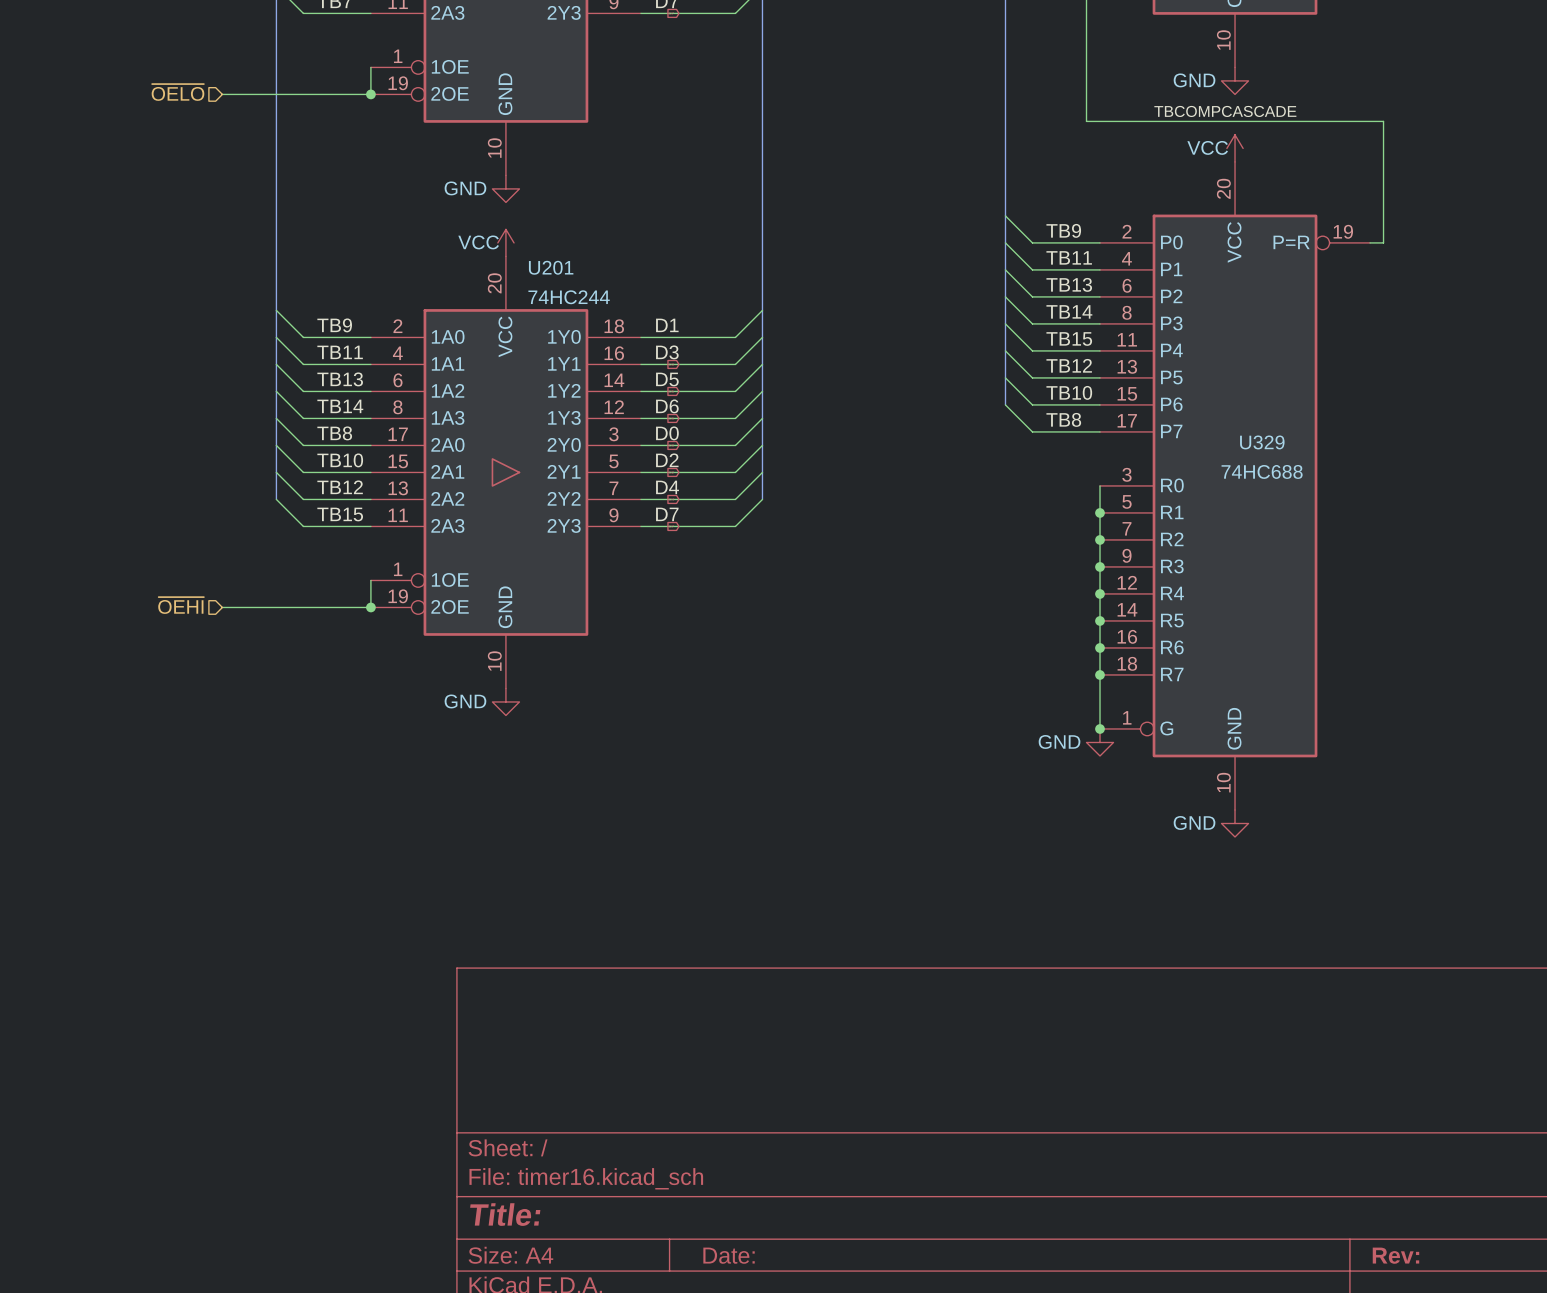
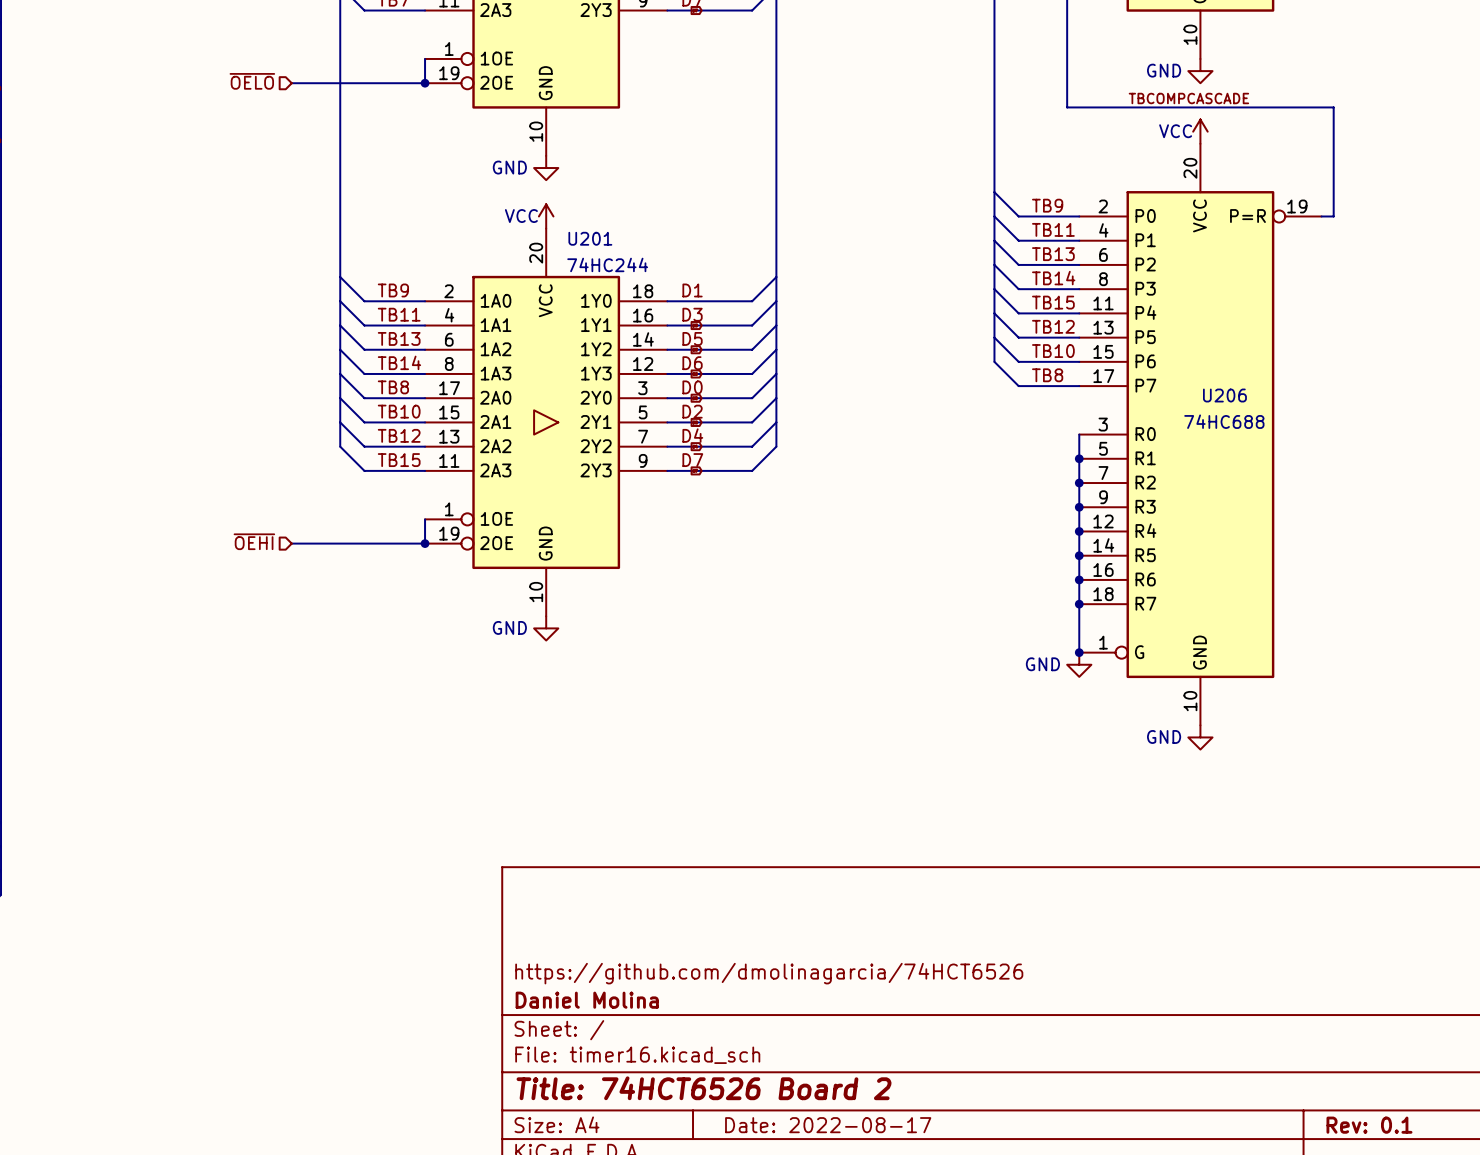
U329 name: U329 (1262, 442) -> U206 (1224, 395)
title block: none -> https://github.com/dmolinagarcia/74HCT6526 (769, 973)
title block: none -> Daniel Molina (587, 1000)
title block: Title: (505, 1214) -> Title: 74HCT6526 Board 2 (704, 1088)
title block: Date: (729, 1255) -> Date: 2022-08-17 (828, 1125)
title block: Rev: (1395, 1255) -> Rev: 0.1 (1369, 1125)

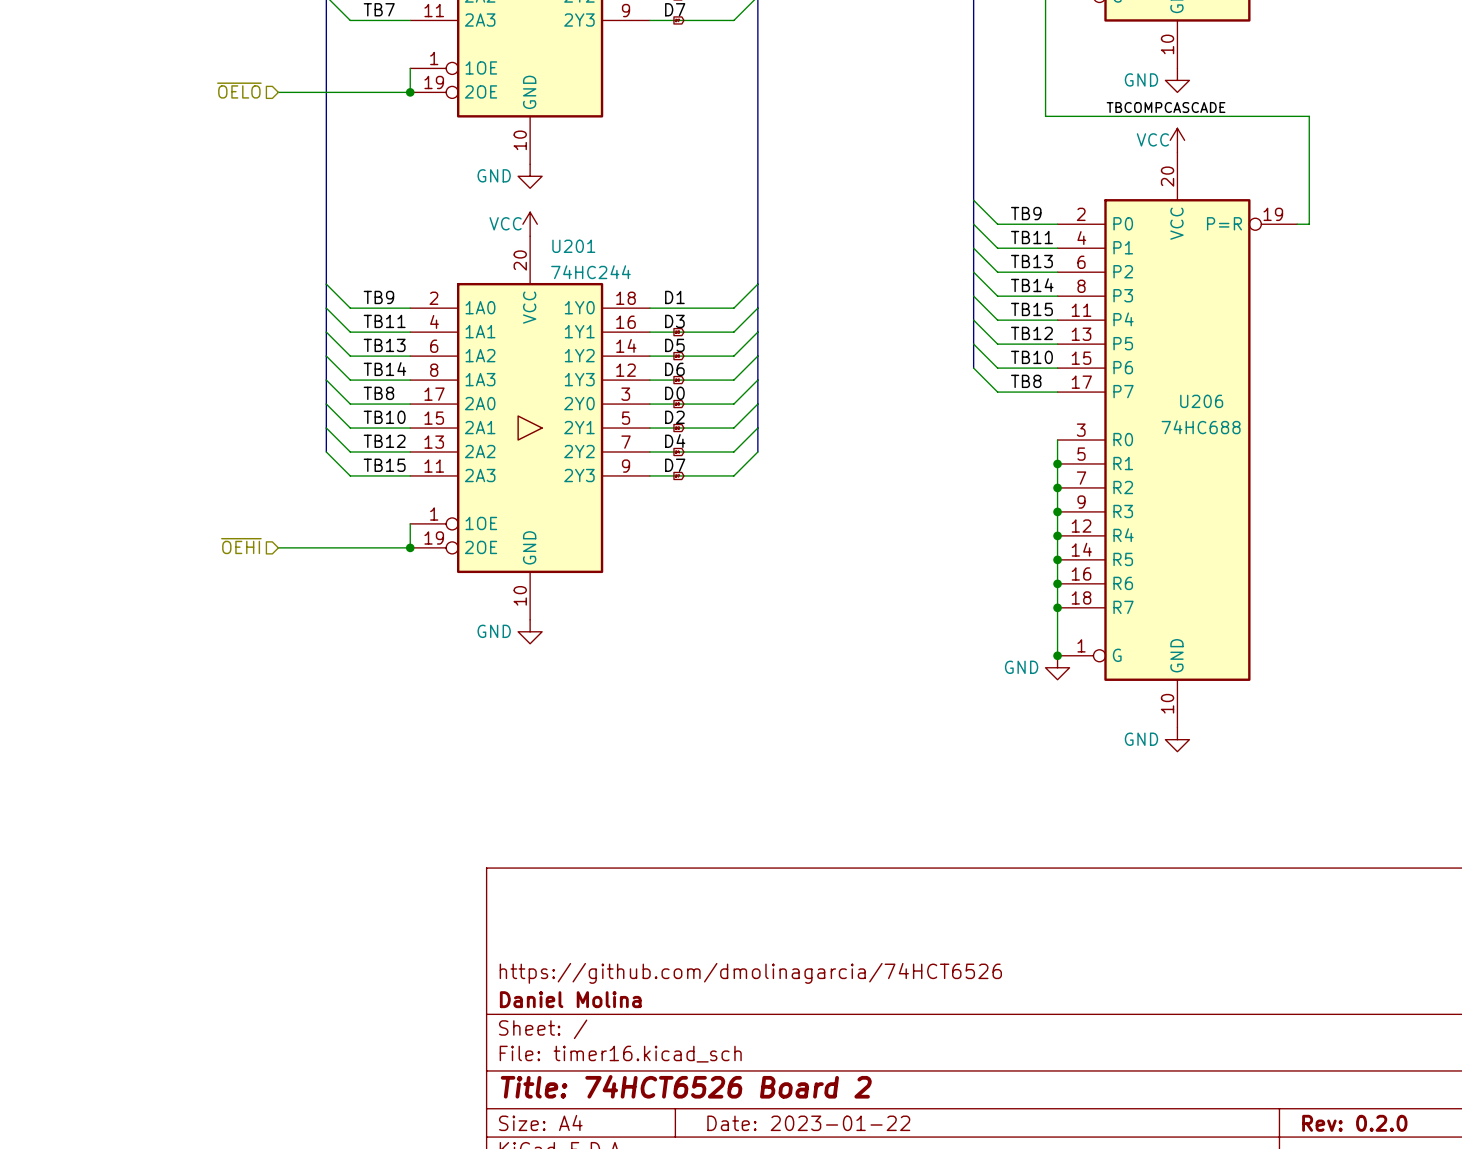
title block: Date: 2022-08-17 (828, 1125) -> Date: 2023-01-22 (808, 1123)
title block: Rev: 0.1 (1369, 1125) -> Rev: 0.2.0 (1354, 1123)

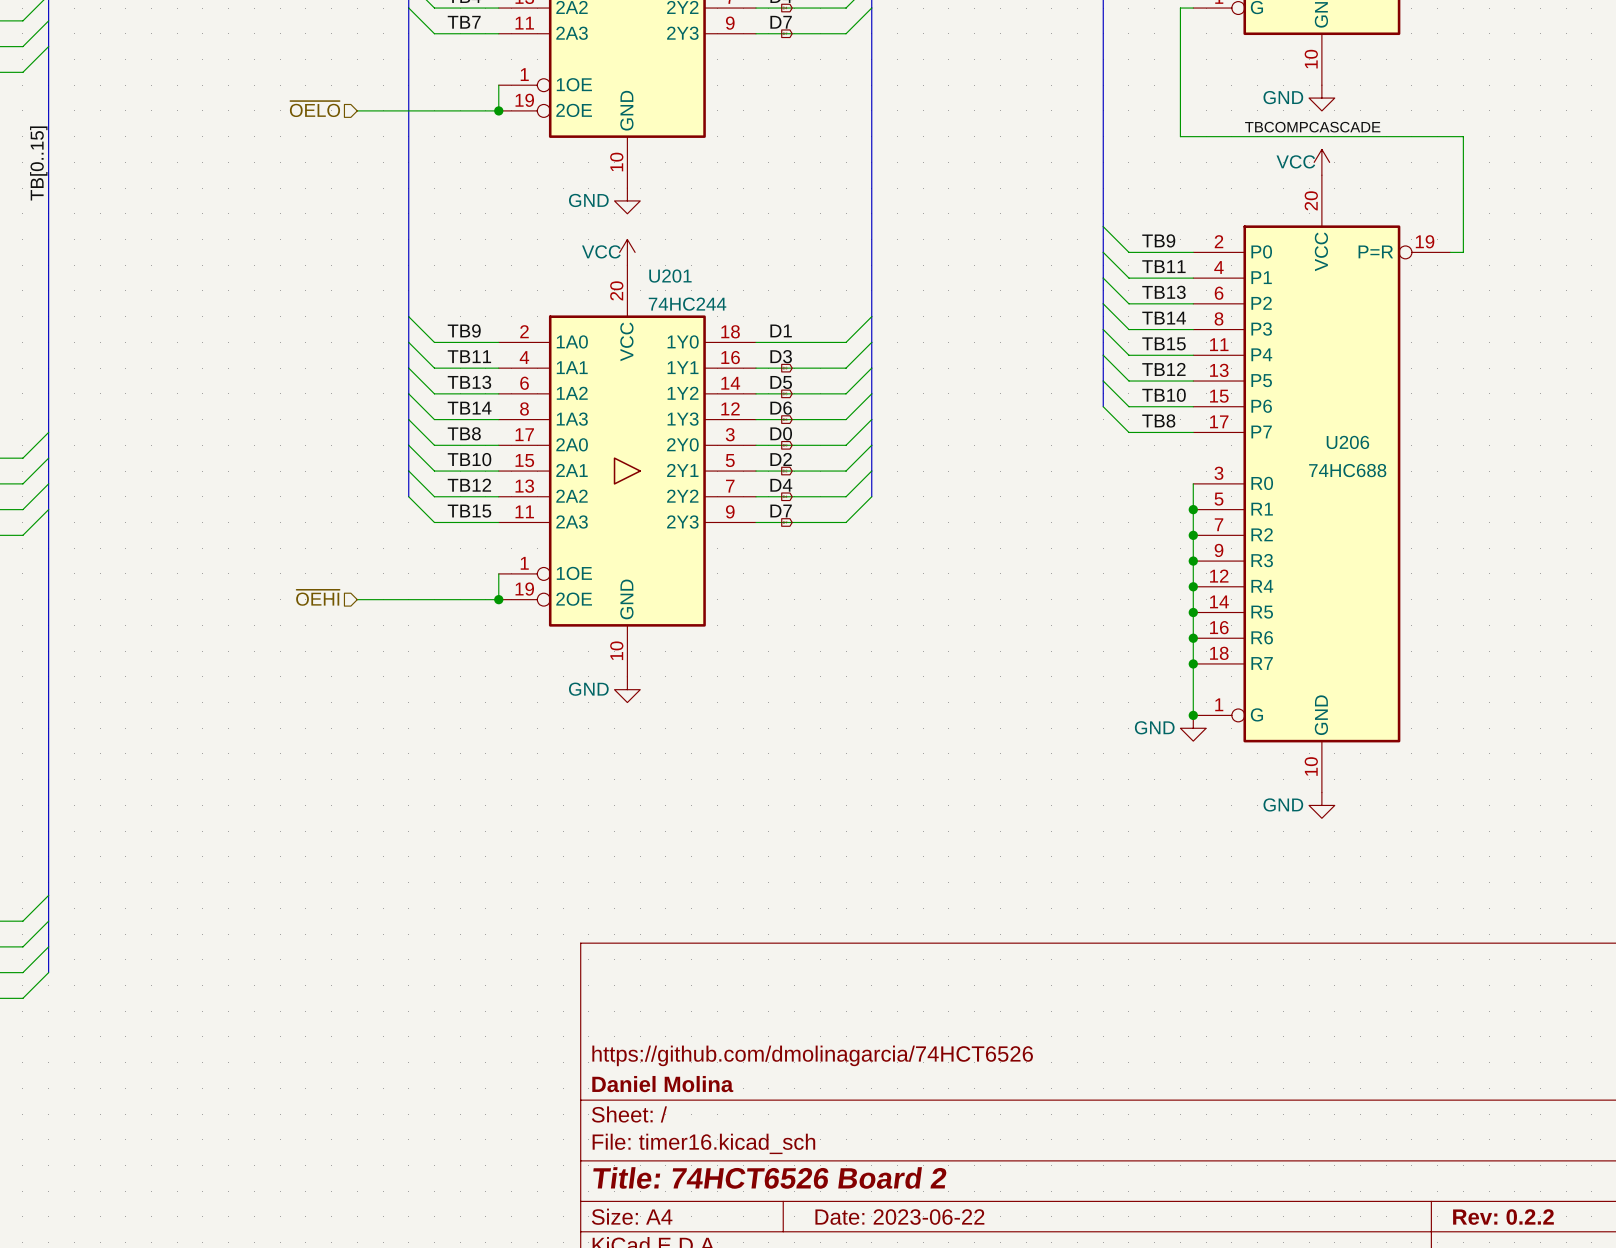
title block: Date: 2023-01-22 (808, 1123) -> Date: 2023-06-22 (899, 1217)
title block: Rev: 0.2.0 (1354, 1123) -> Rev: 0.2.2 (1503, 1217)

